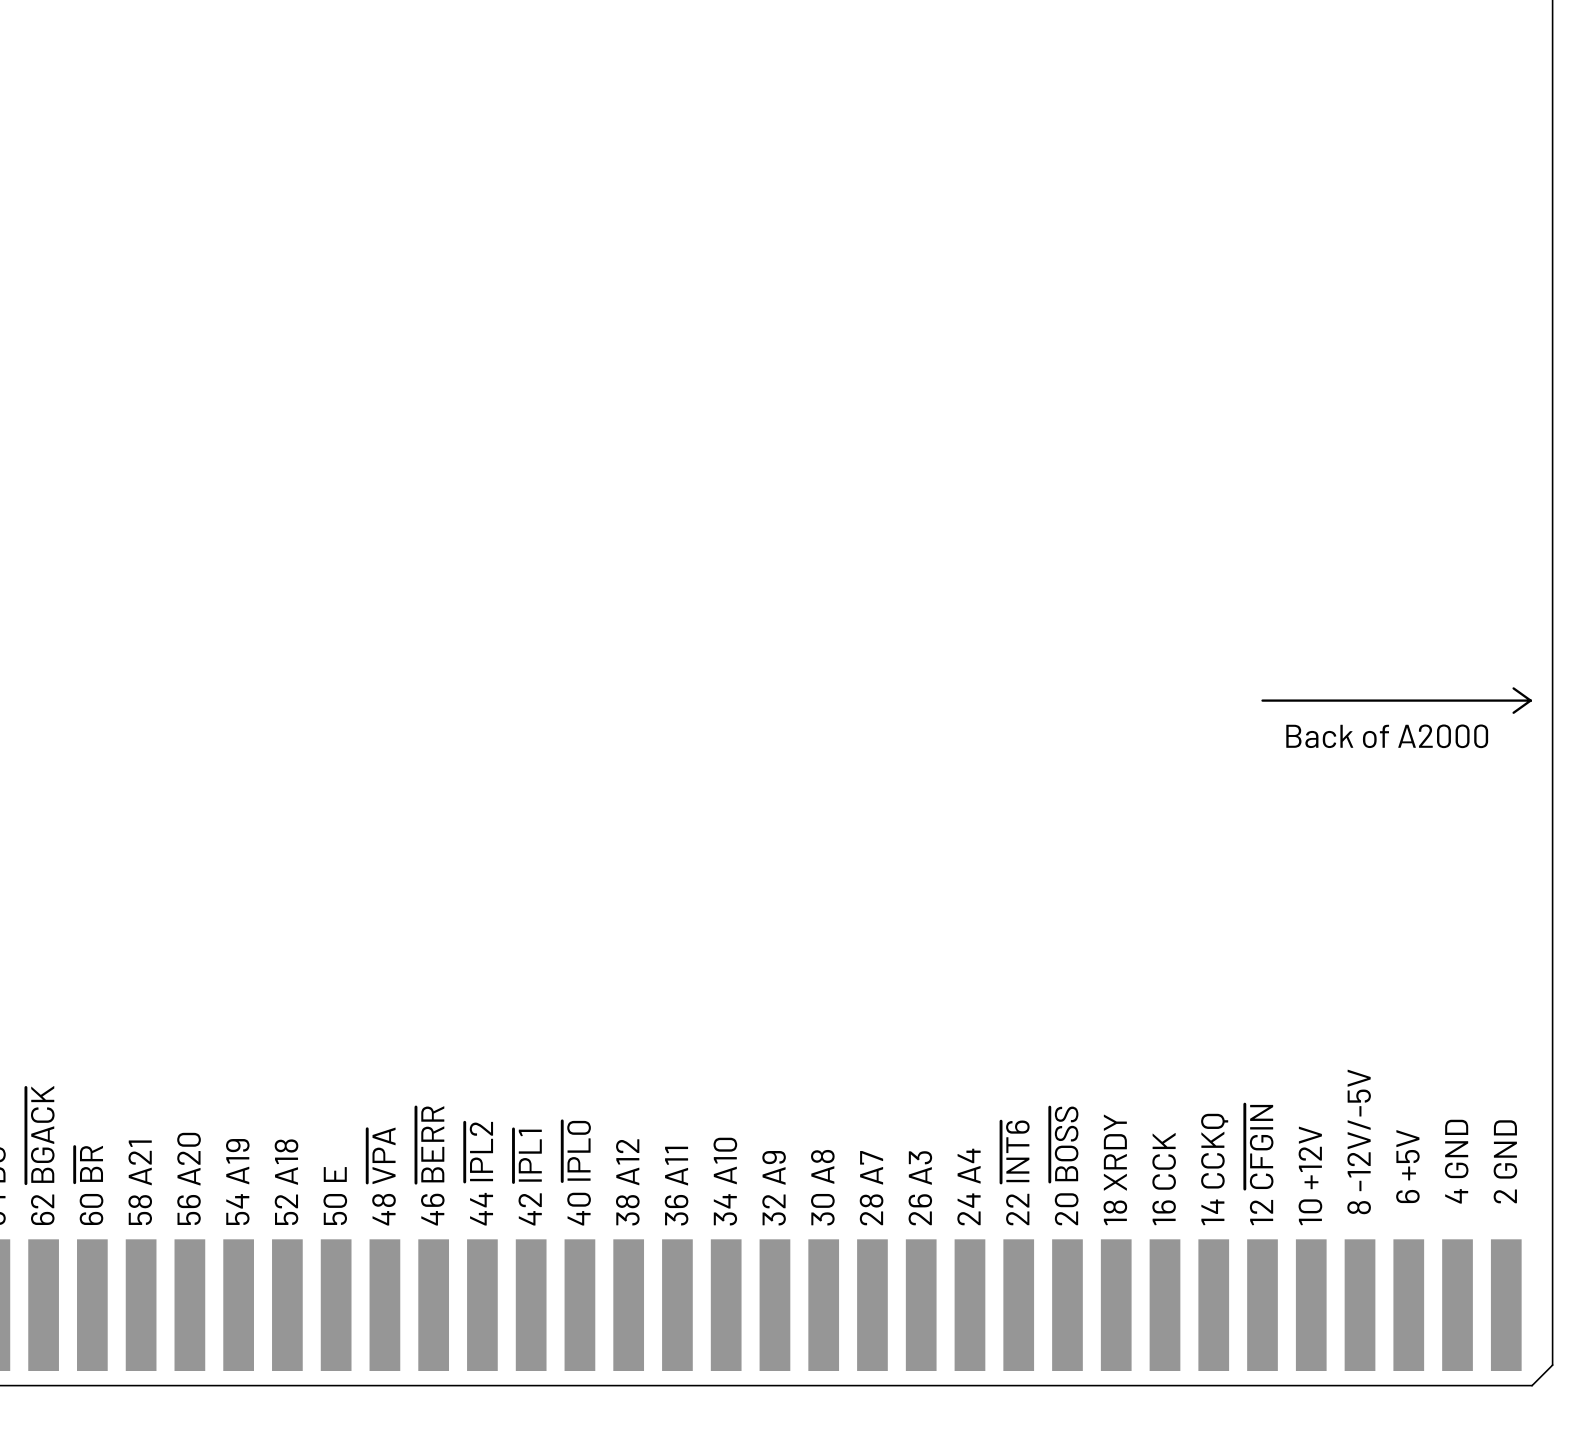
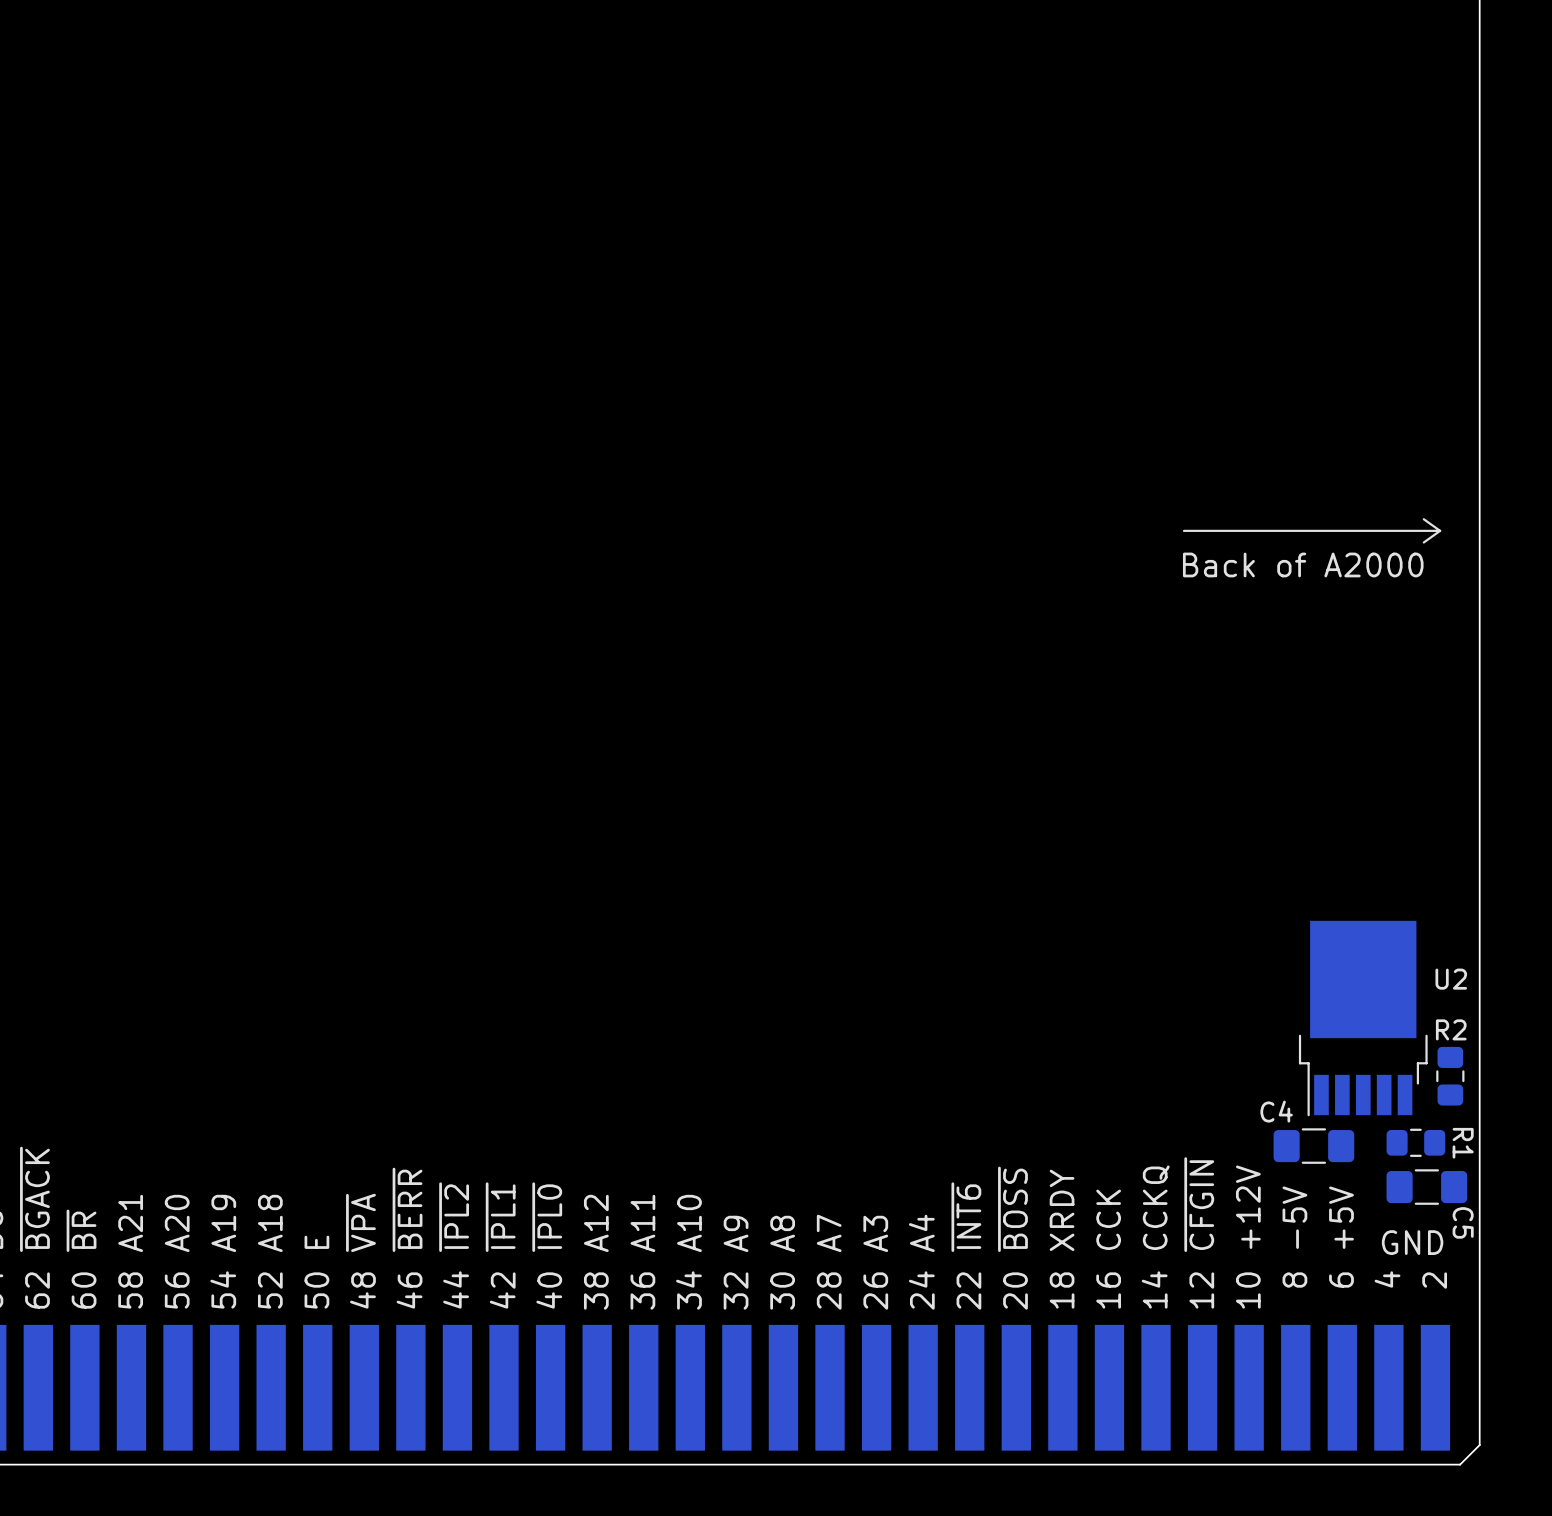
line: (1513, 688) (1530, 700) -> (1423, 519) (1440, 530)
line: (1530, 700) (1513, 712) -> (1440, 530) (1423, 542)
line: (1530, 700) (1262, 700) -> (1440, 530) (1183, 530)
text position: Back of A2000 (1387, 736) -> Back of A2000 (1303, 564)
U2: none -> (1363, 1018)
R2: none -> (1450, 1076)
R1: none -> (1415, 1142)
C4: none -> (1313, 1146)
C5: none -> (1426, 1187)
text: 8 -12V/-5V (1359, 1141) -> 8 -5V (1294, 1237)
text: none -> GND (1412, 1242)
text: 4 GND (1456, 1161) -> 4 (1387, 1279)
text: 2 GND (1505, 1161) -> 2 (1434, 1280)

